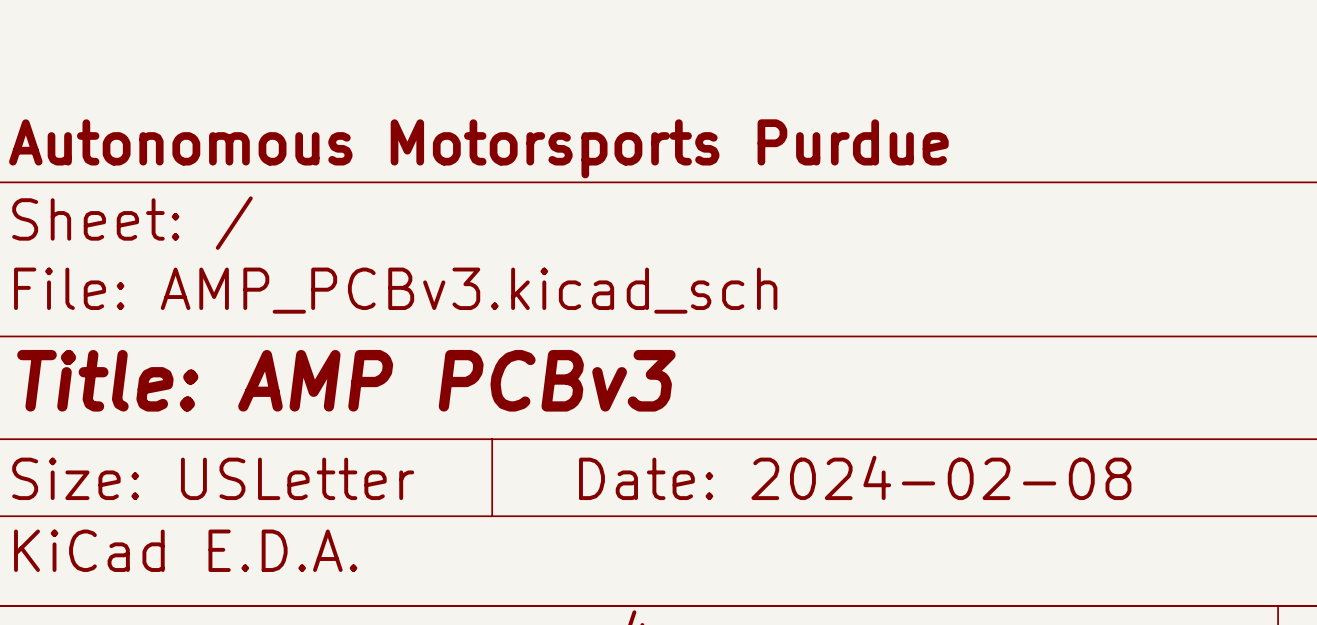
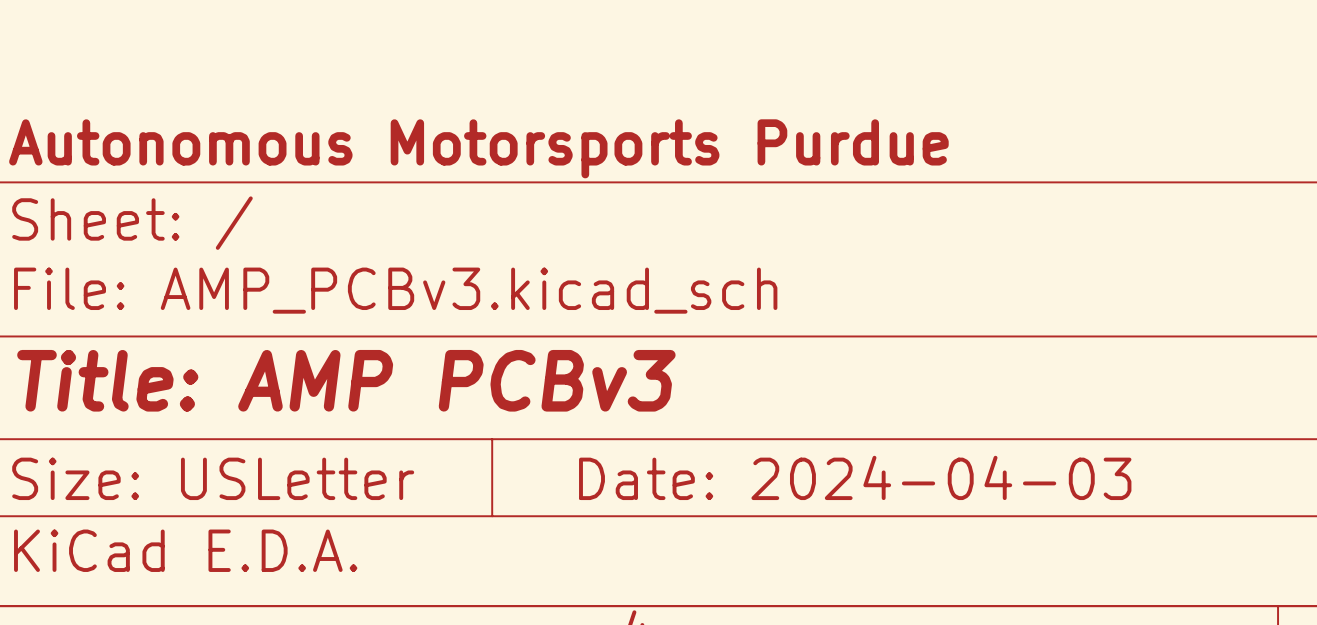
title block: Date: 2024-02-08 (855, 477) -> Date: 2024-04-03 (855, 477)

